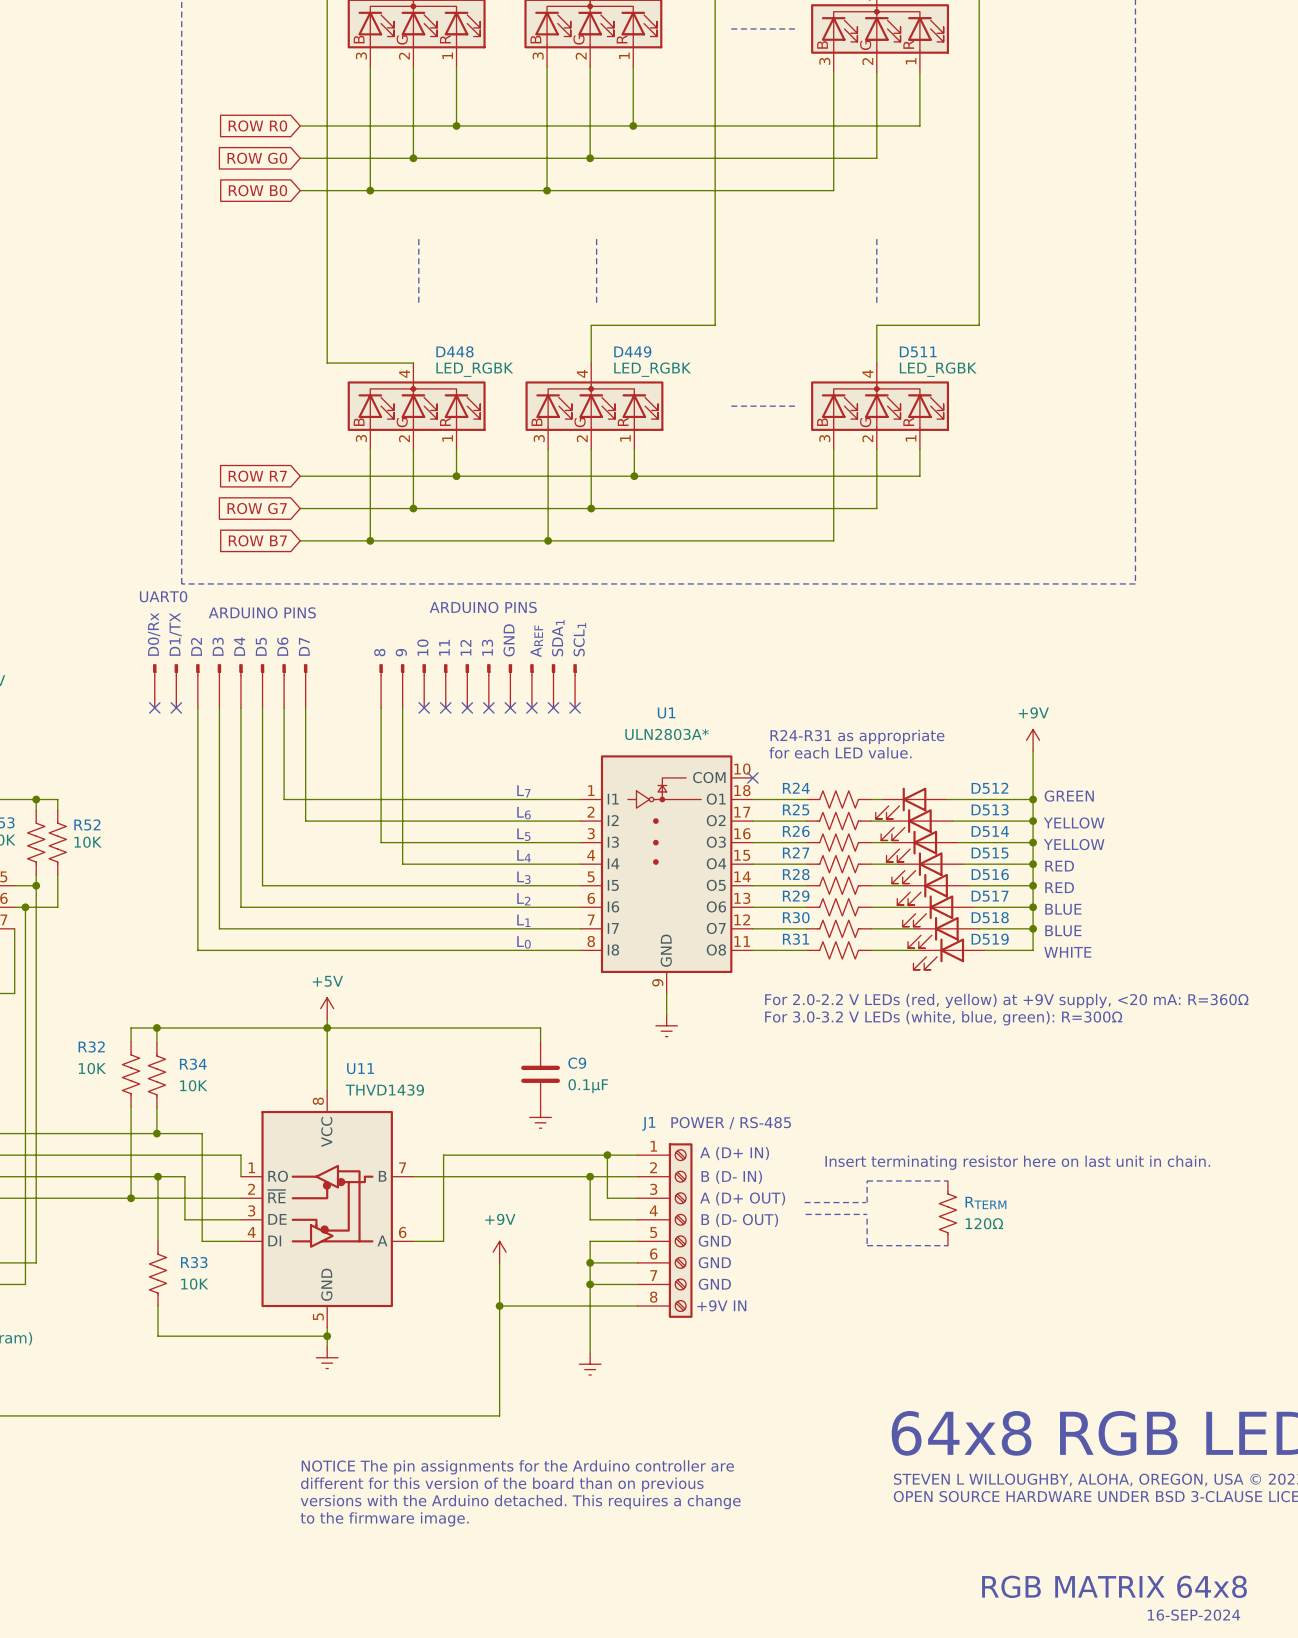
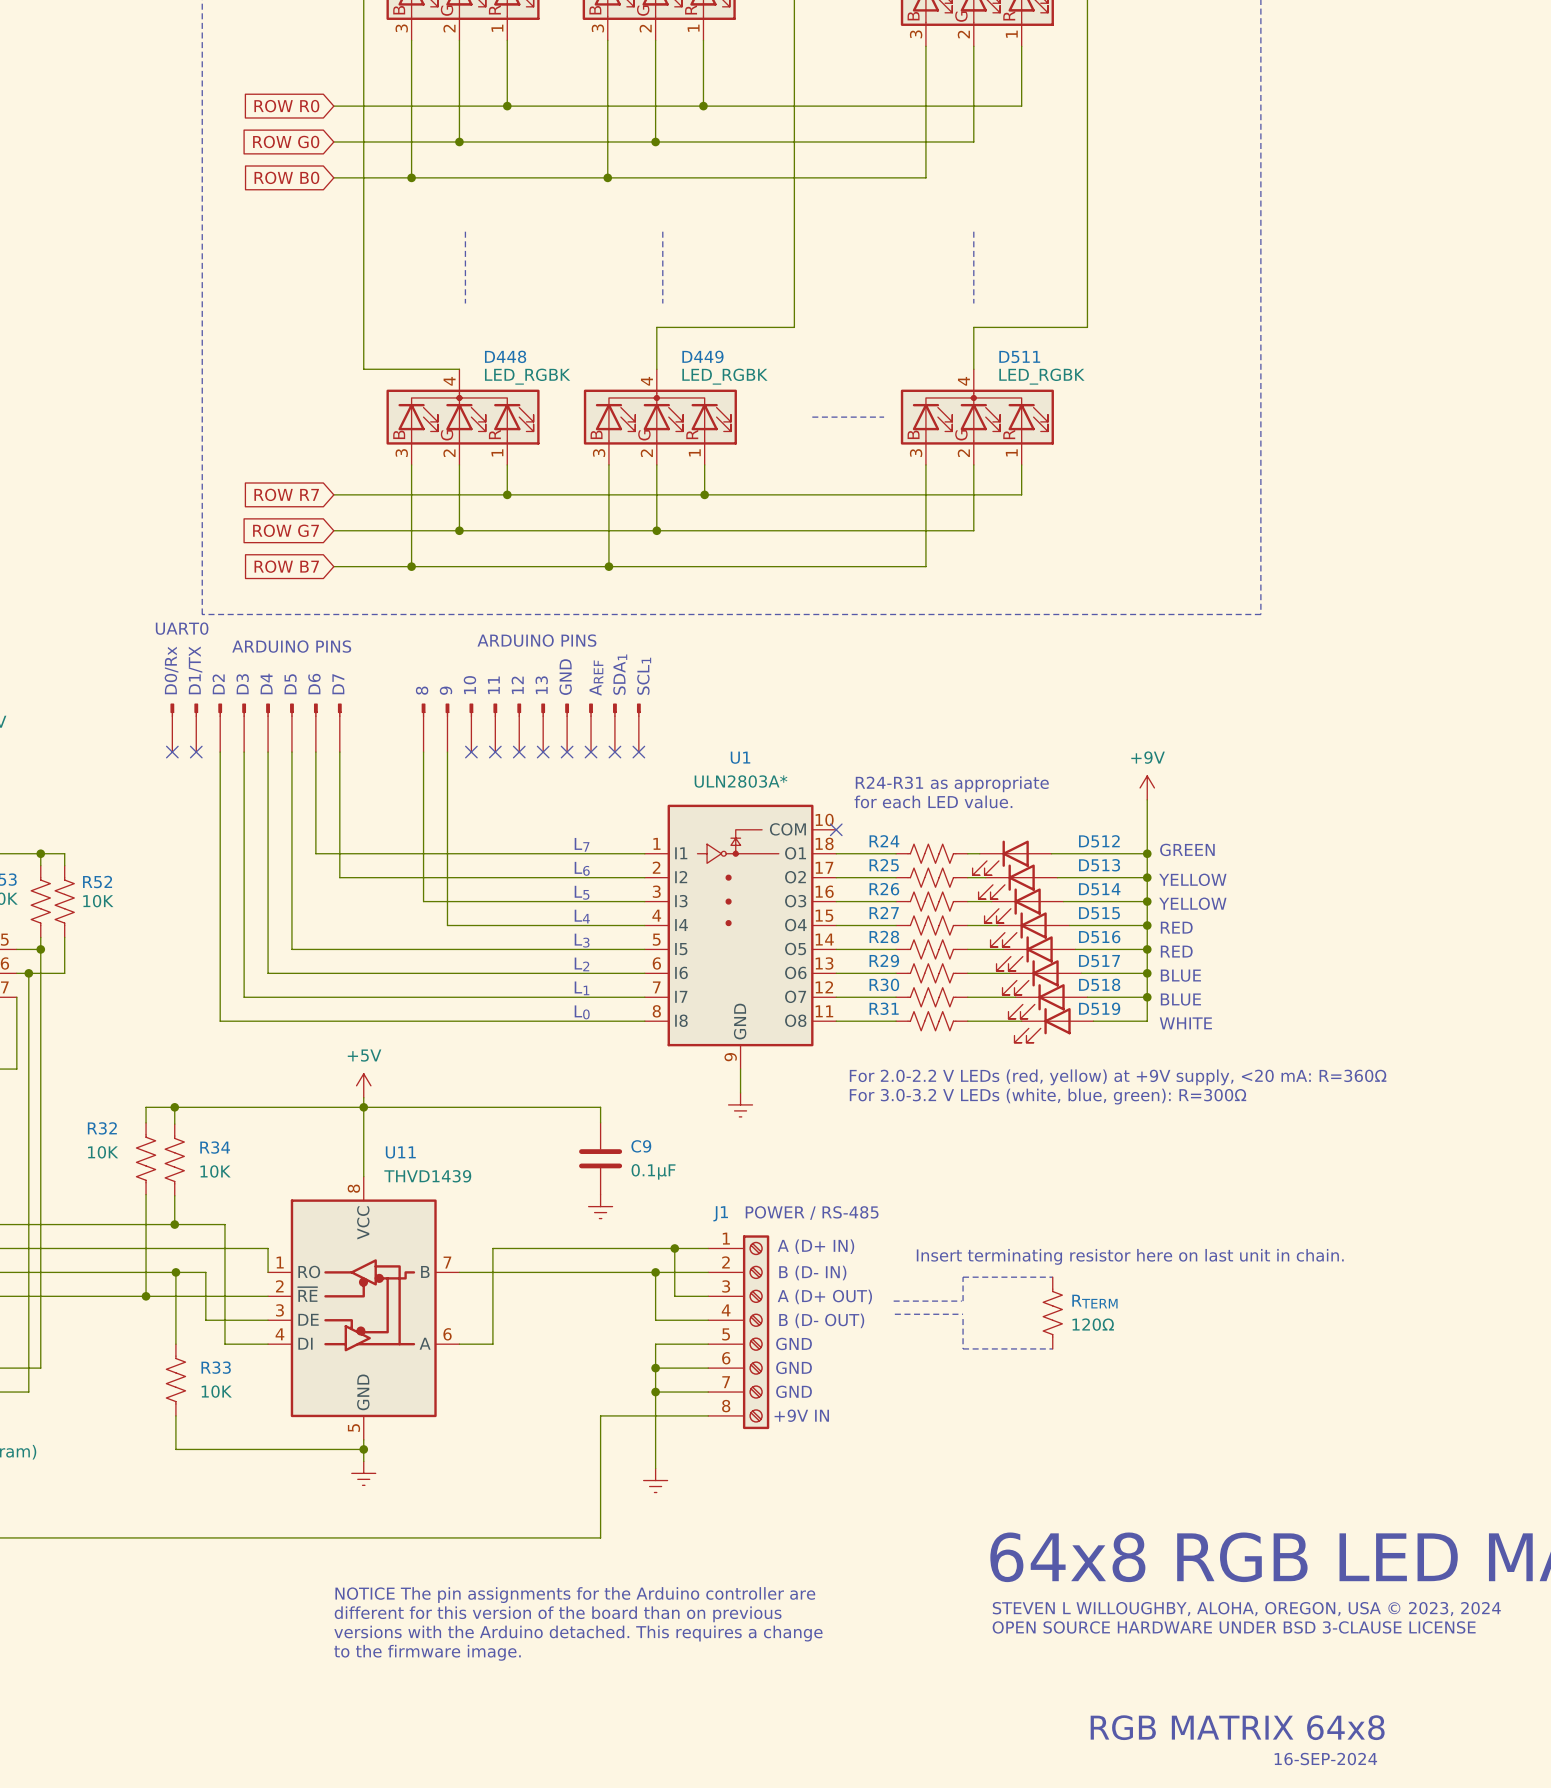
power symbol: +9V (499, 1252) -> none
wire: (499, 1262) (499, 1415) -> (600, 1415) (600, 1537) (555, 1537)
wire: (499, 1306) (540, 1306) -> none
junction: (499, 1306) -> none

